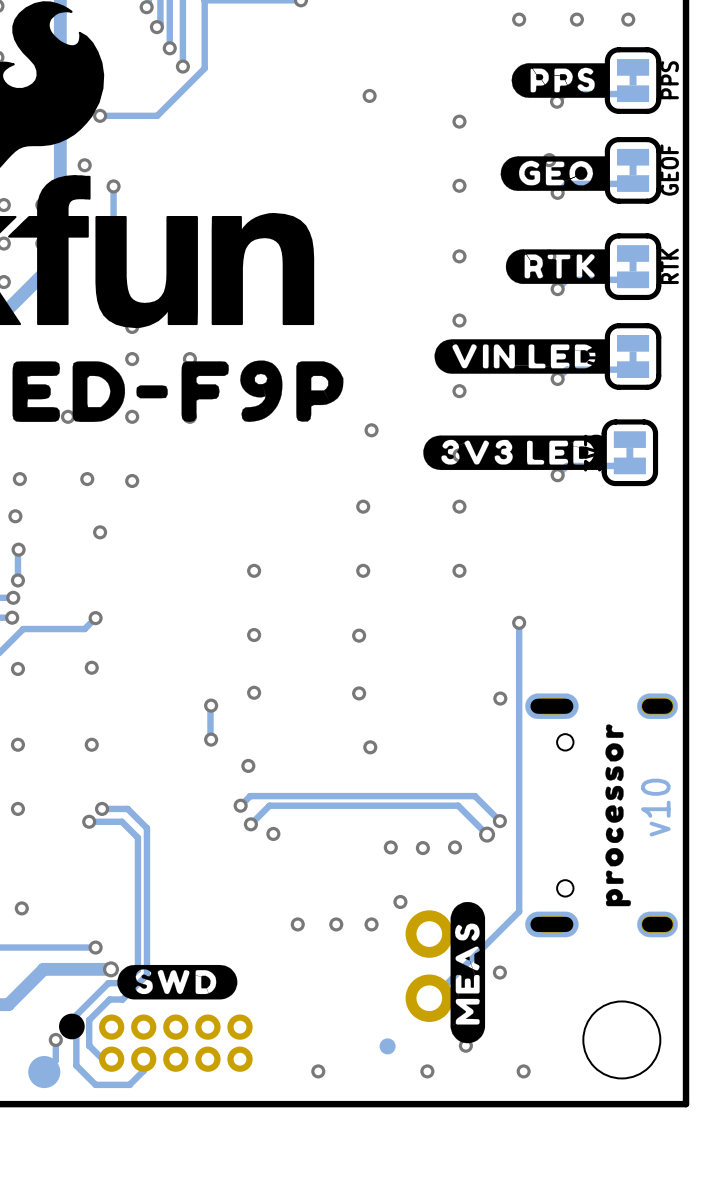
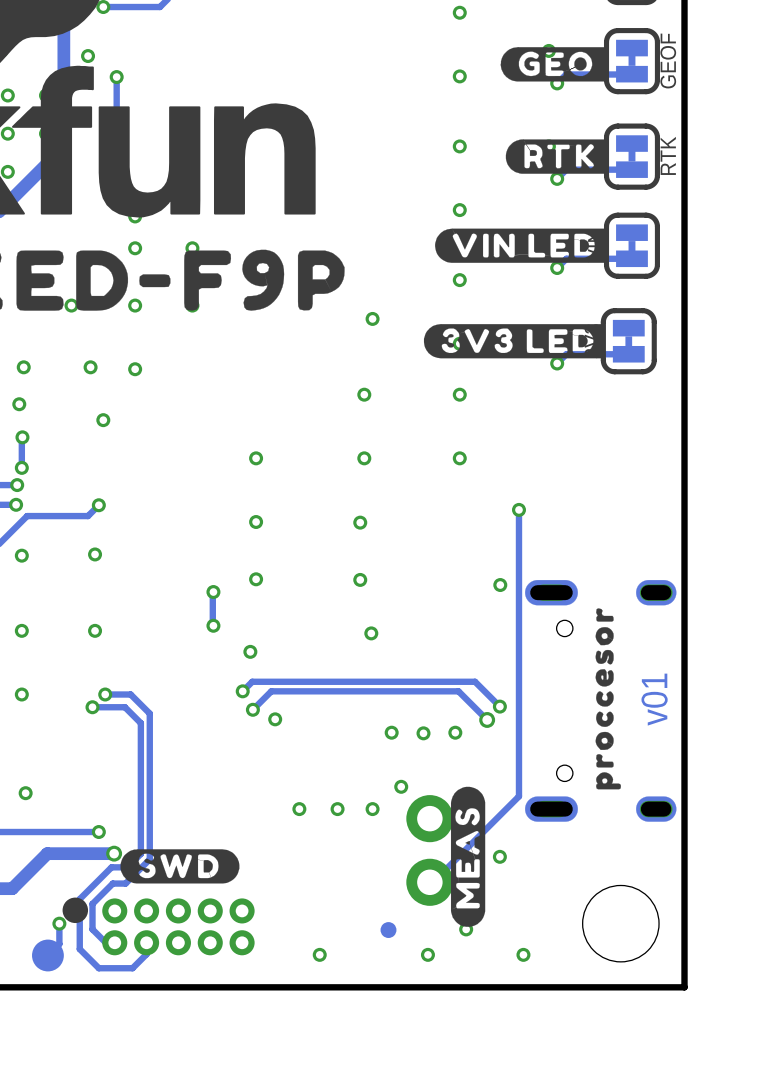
drawing shape: [605, 724, 631, 907] -> [595, 608, 621, 790]
text: v10 (655, 807) -> v01 (654, 699)

